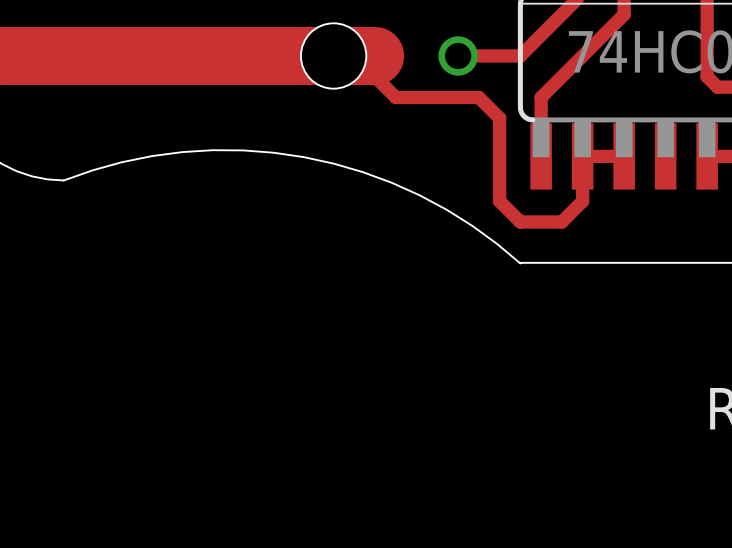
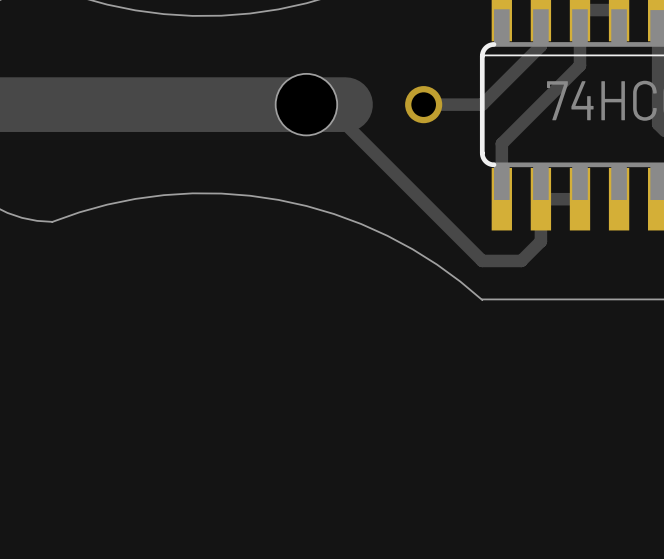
track: (395, 97) (478, 97) (499, 118) (499, 201) -> (365, 143) (462, 241)

